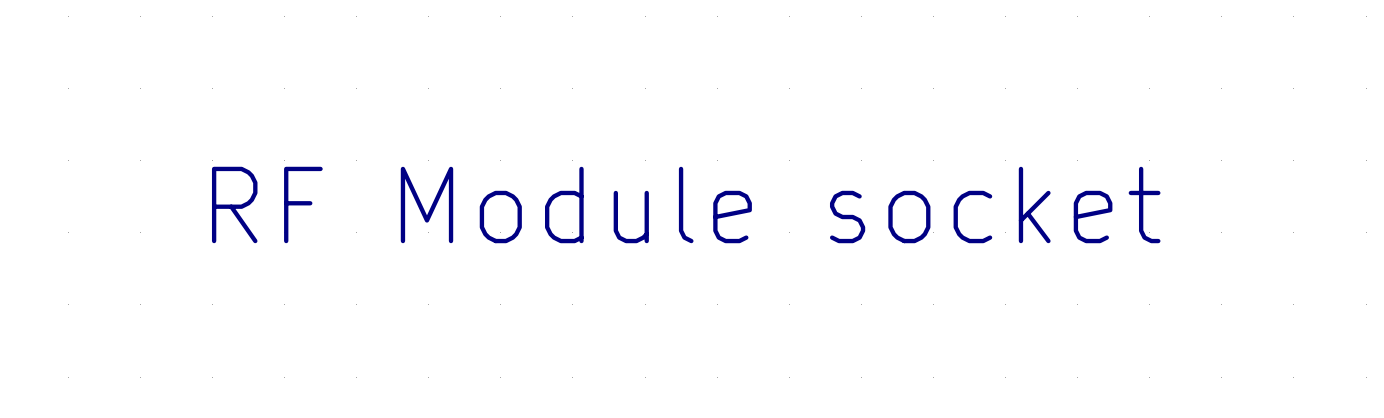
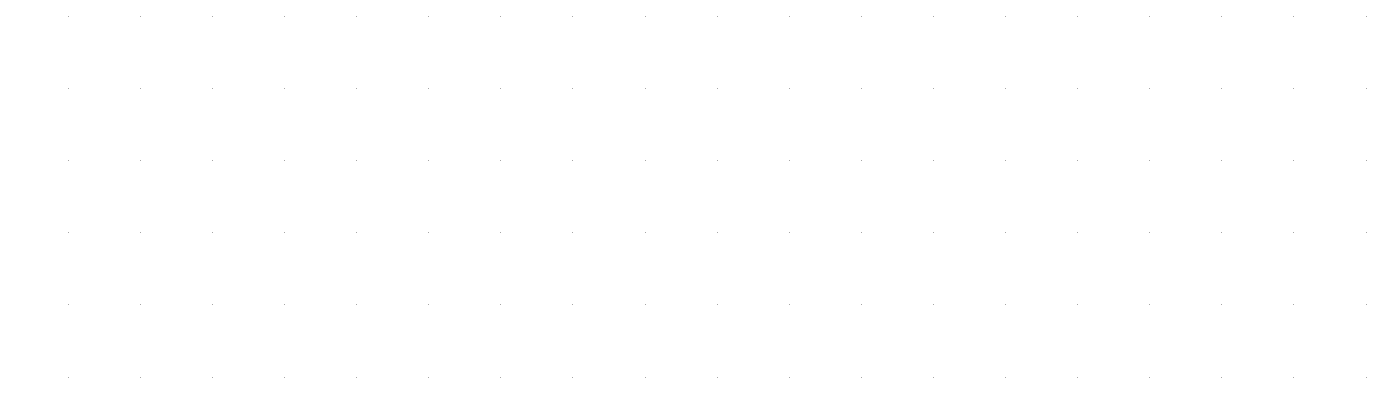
text: RF Module socket (686, 204) -> none

